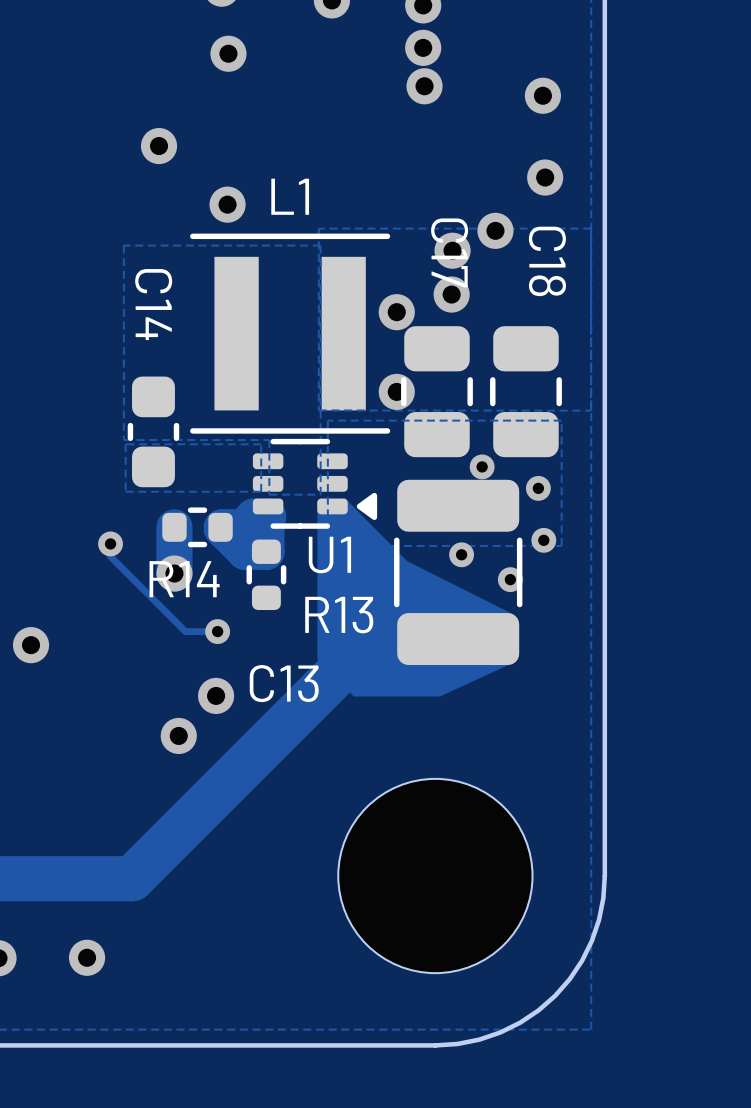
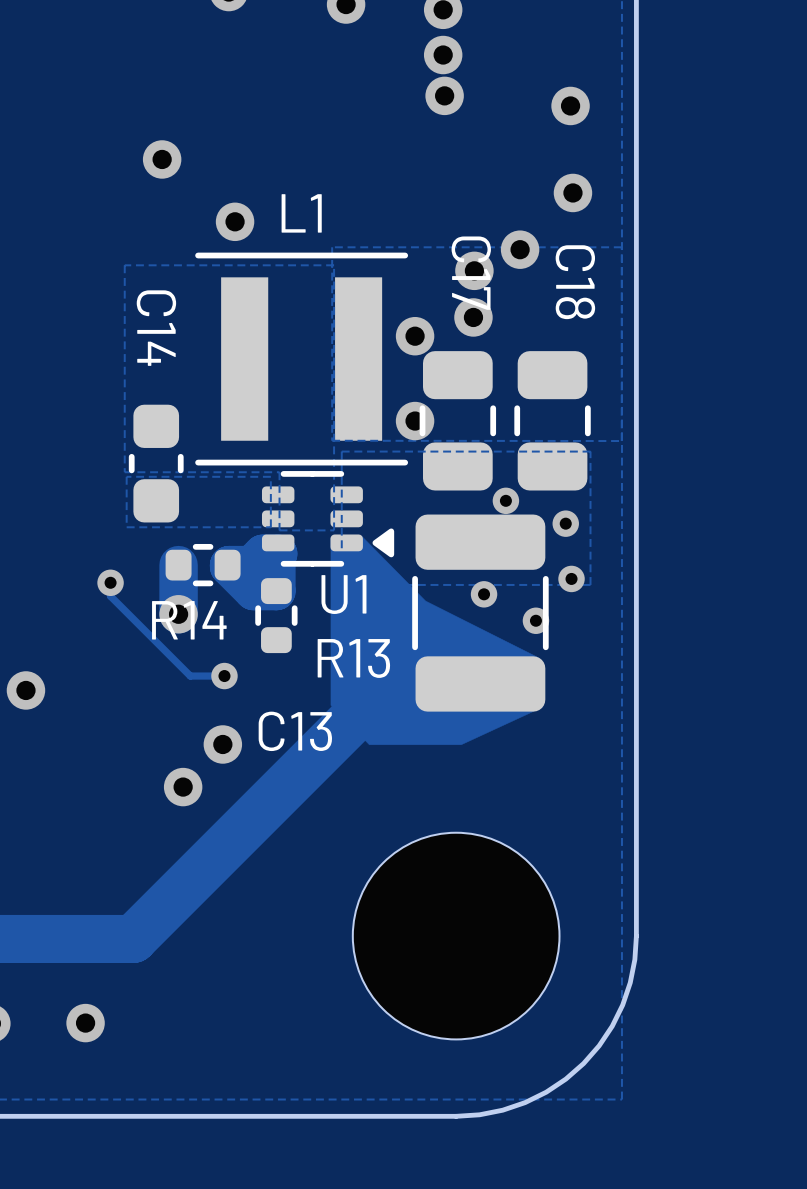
via: (228, 53) -> none

